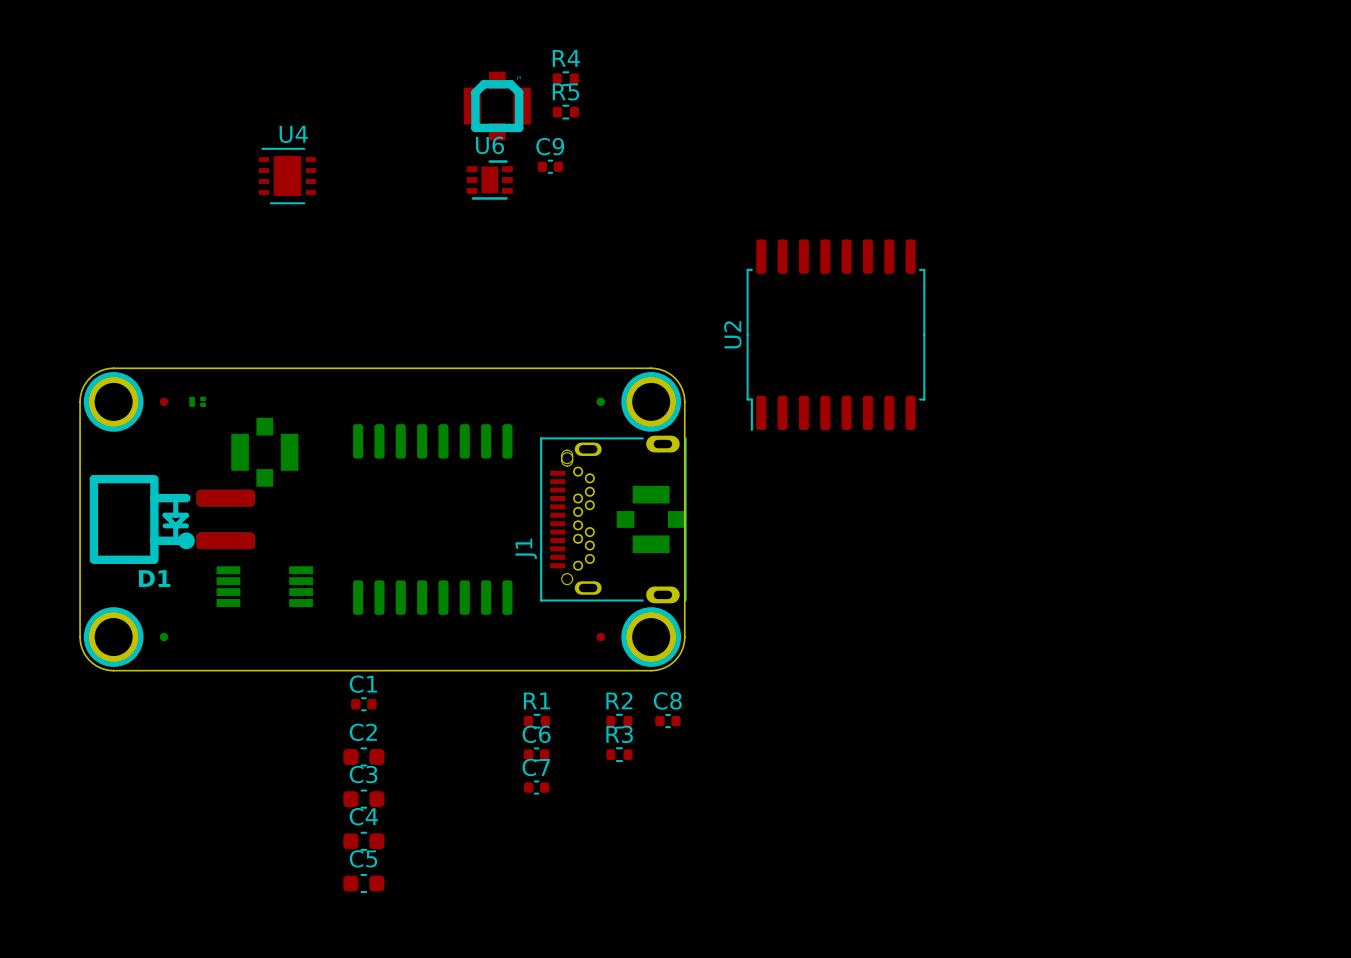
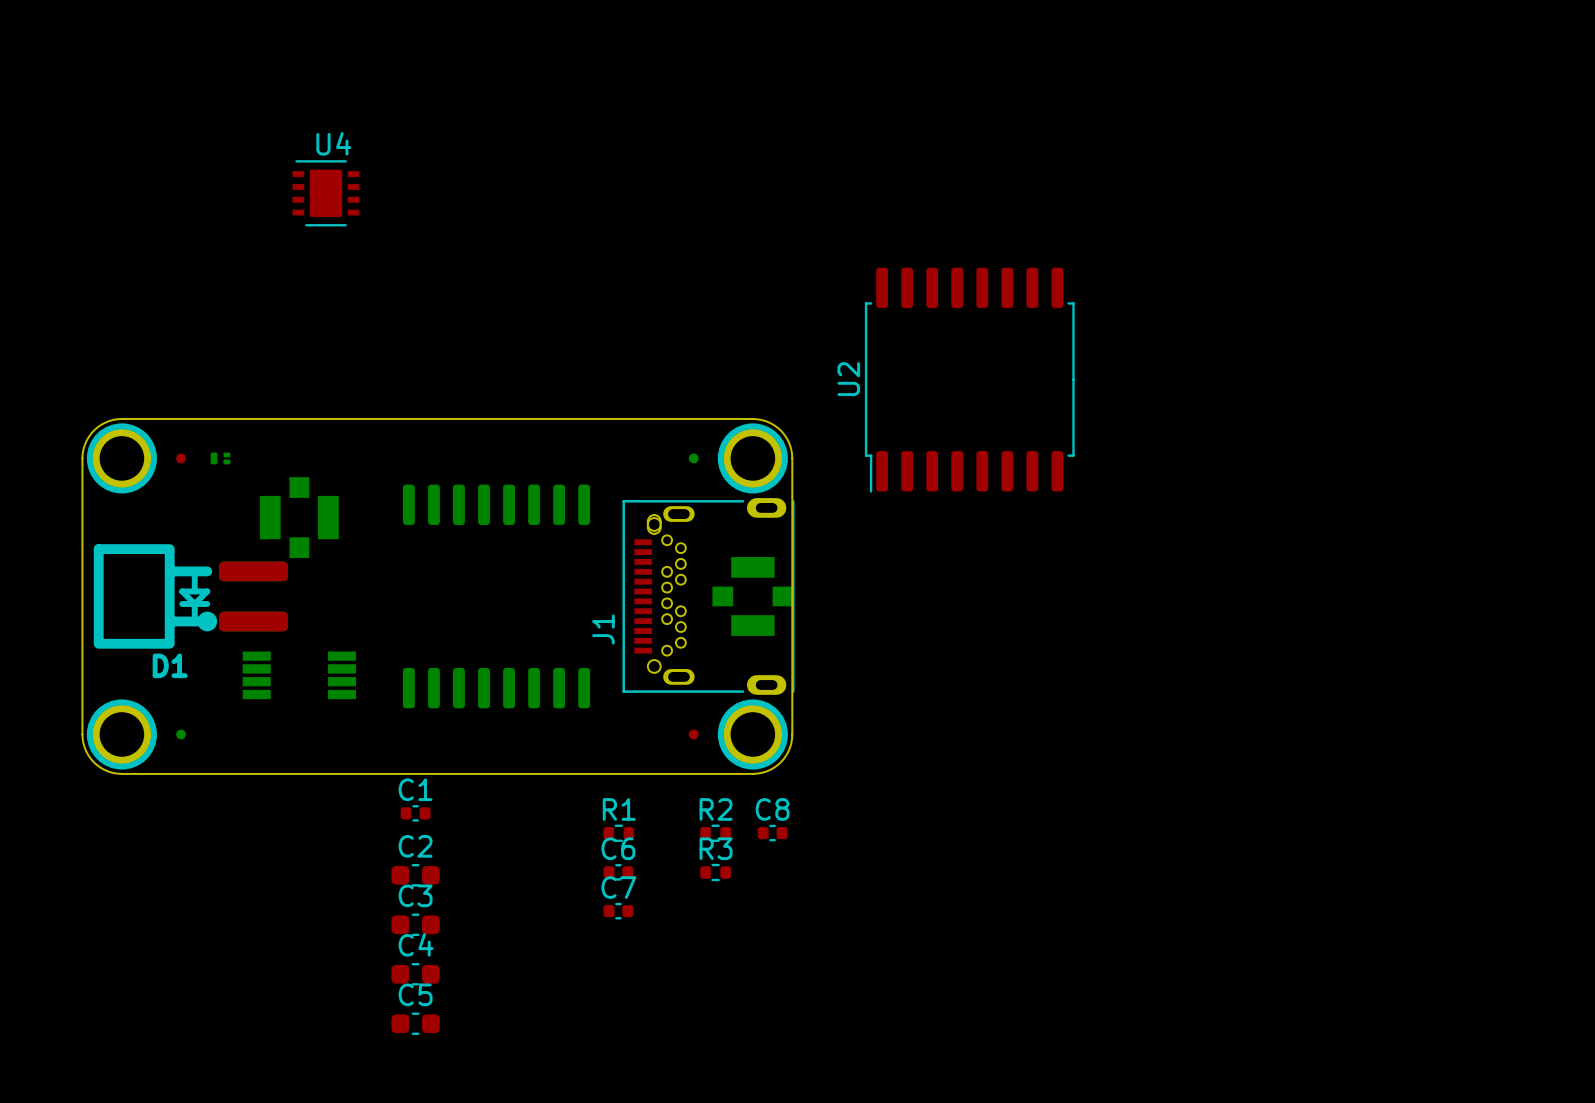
R4: (565, 78) -> none
part: (497, 106) -> none
R5: (565, 112) -> none
C9: (550, 166) -> none
U6: (489, 179) -> none

